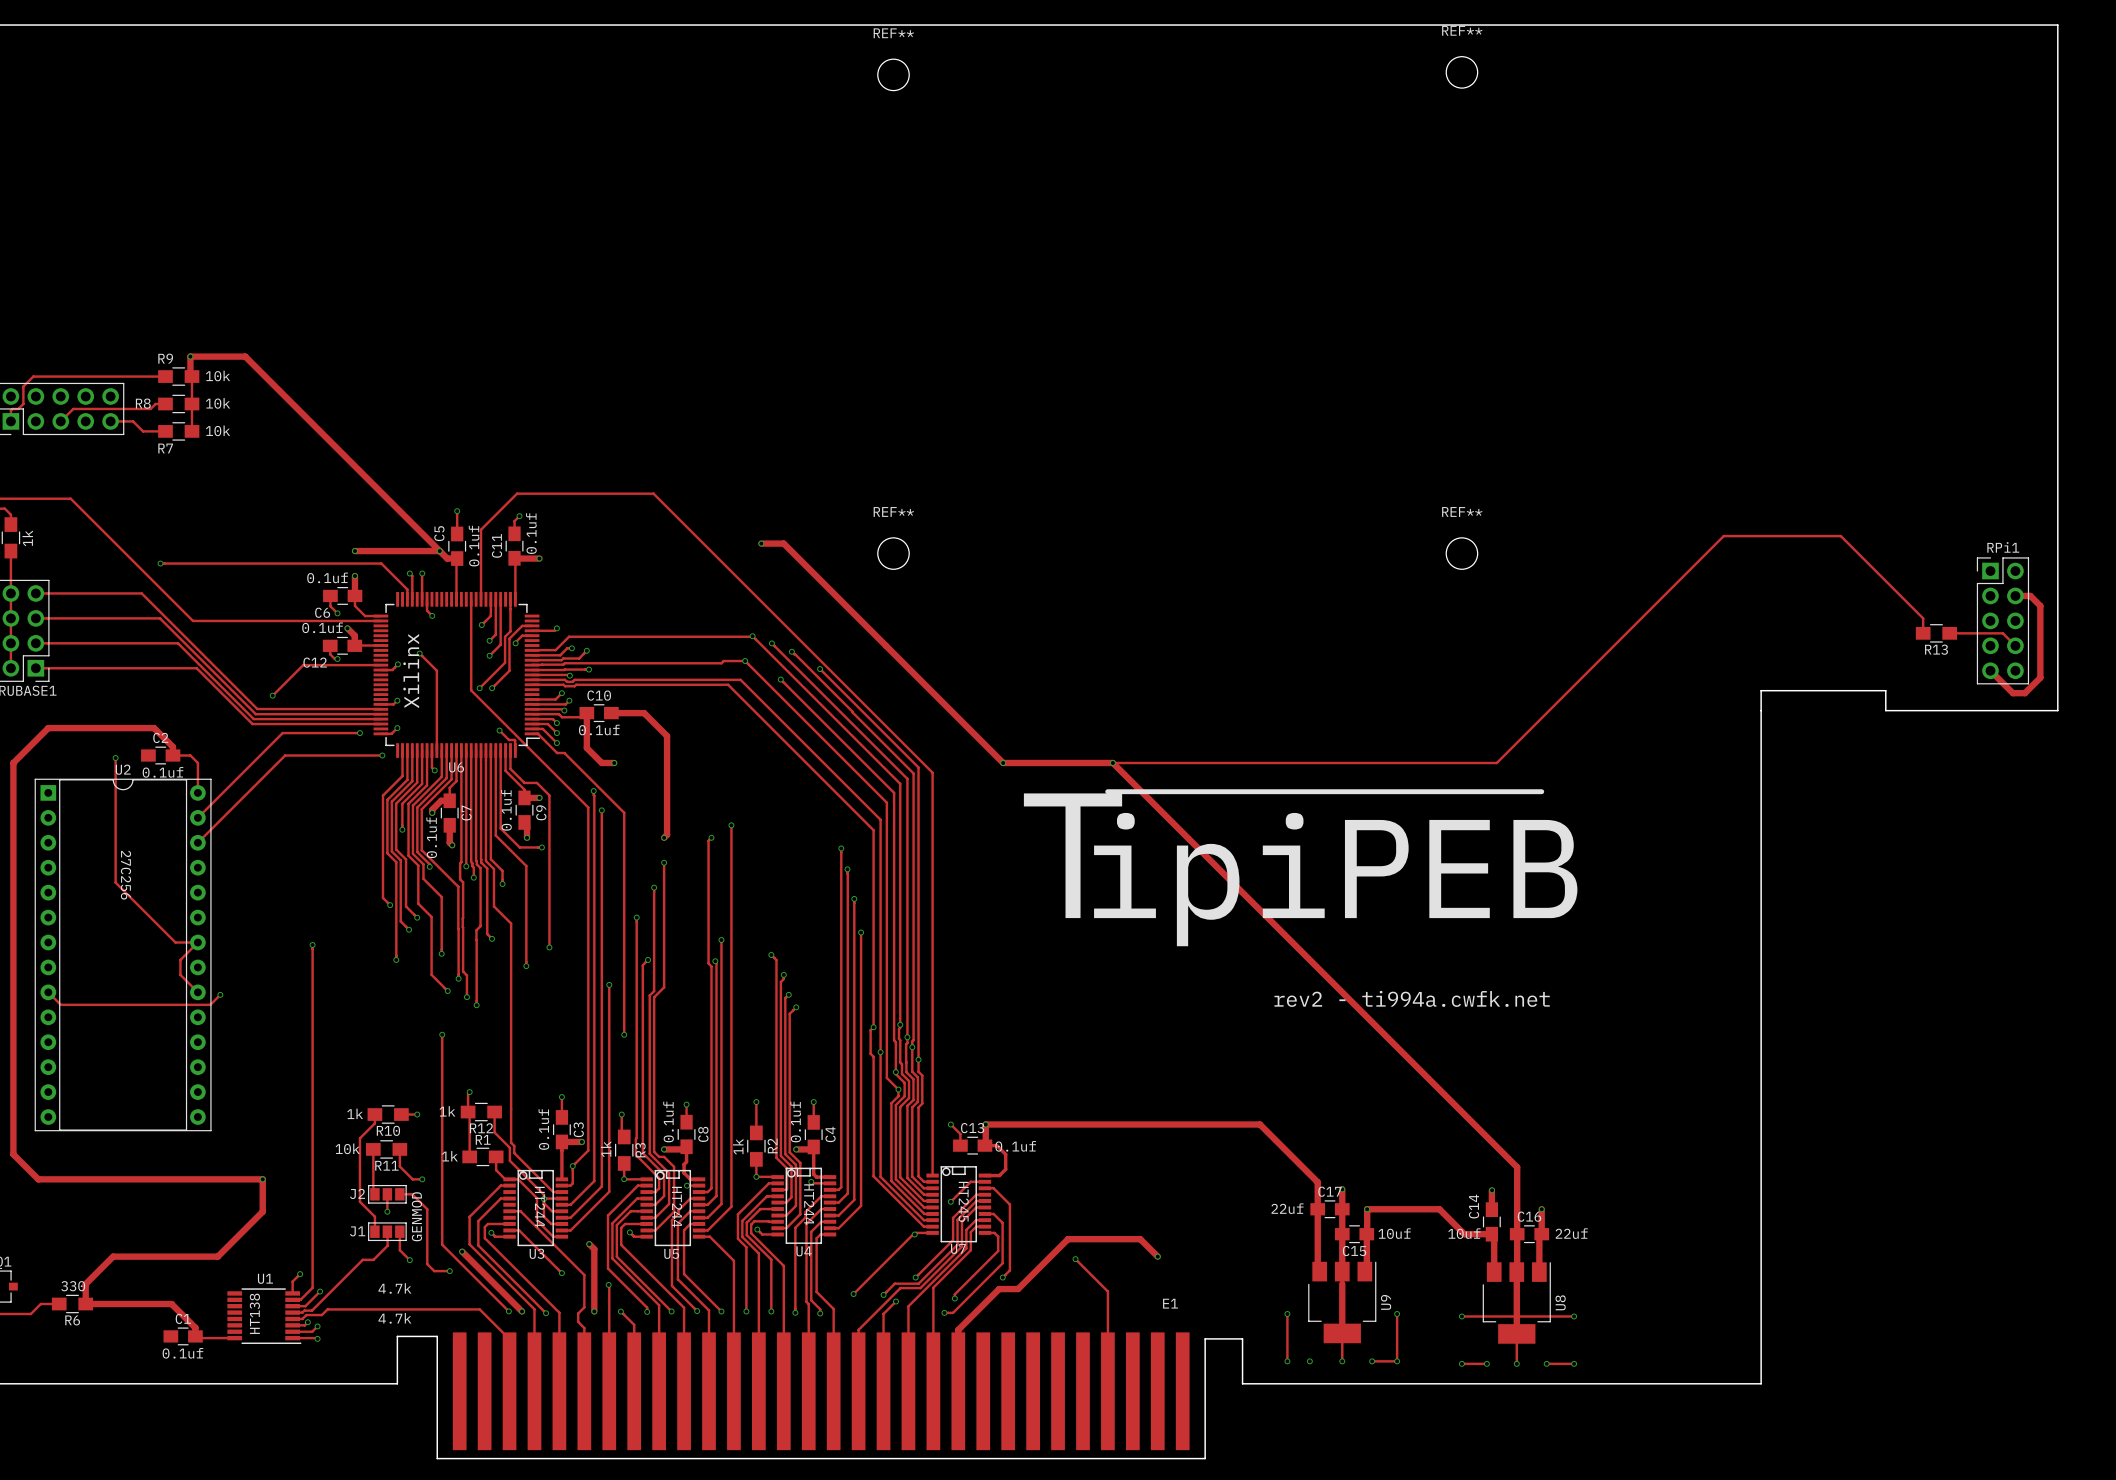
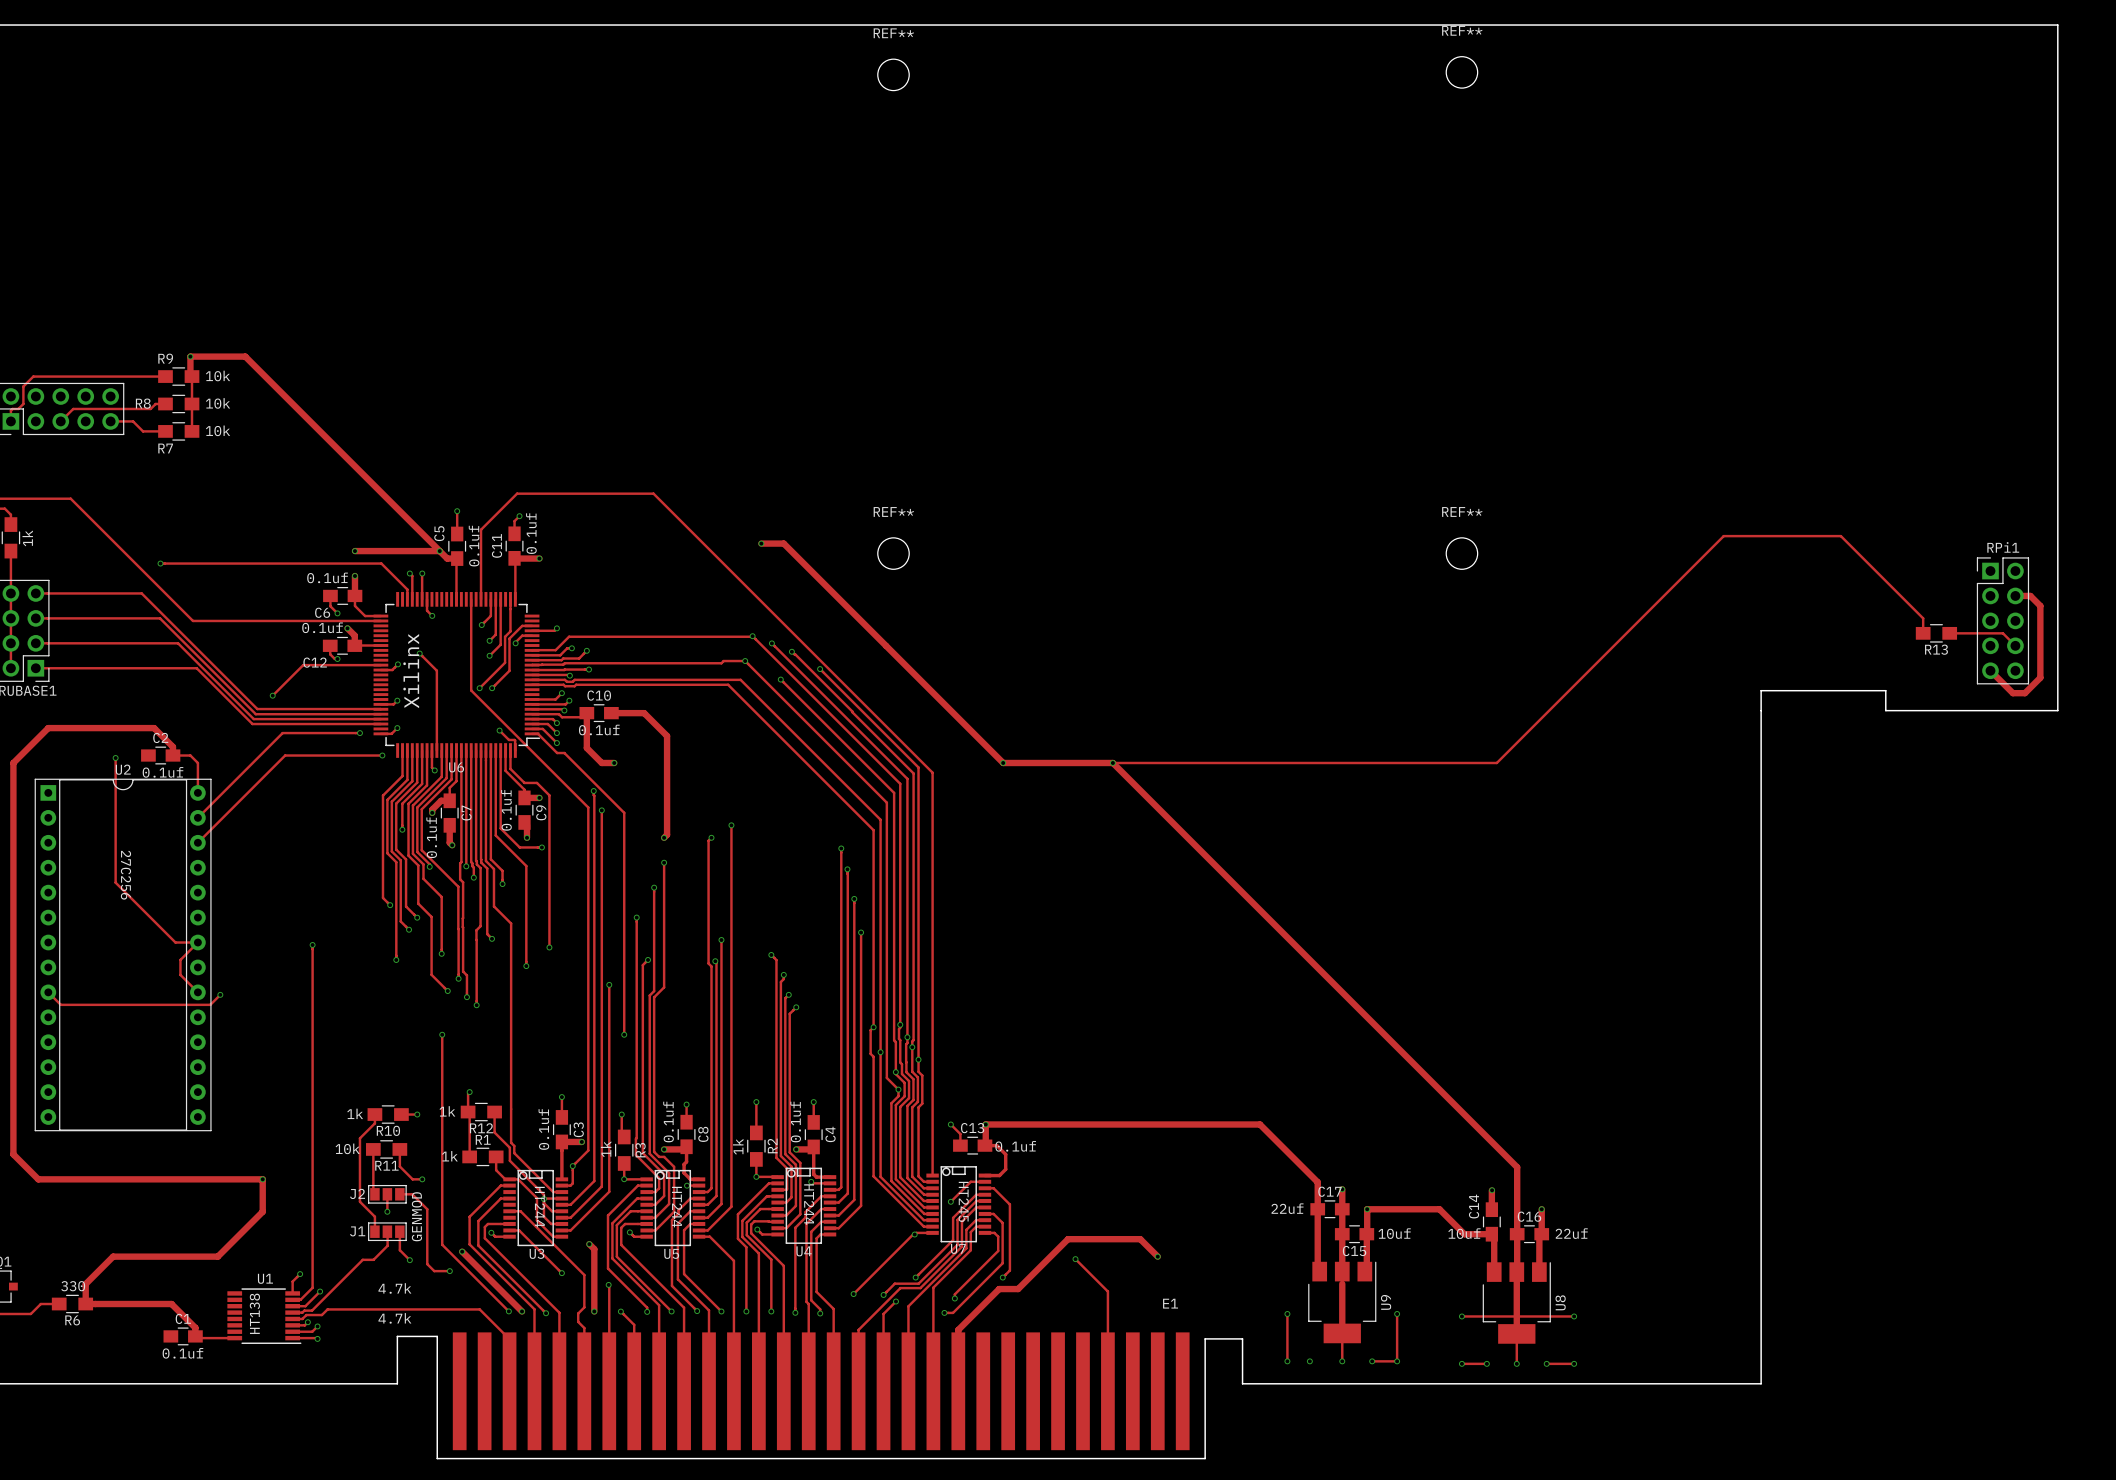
line: (1107, 791) (1541, 791) -> none
text: T (1073, 855) -> none
text: ipiPEB (1335, 879) -> none
text: rev2 - ti994a.cwfk.net (1412, 998) -> none

